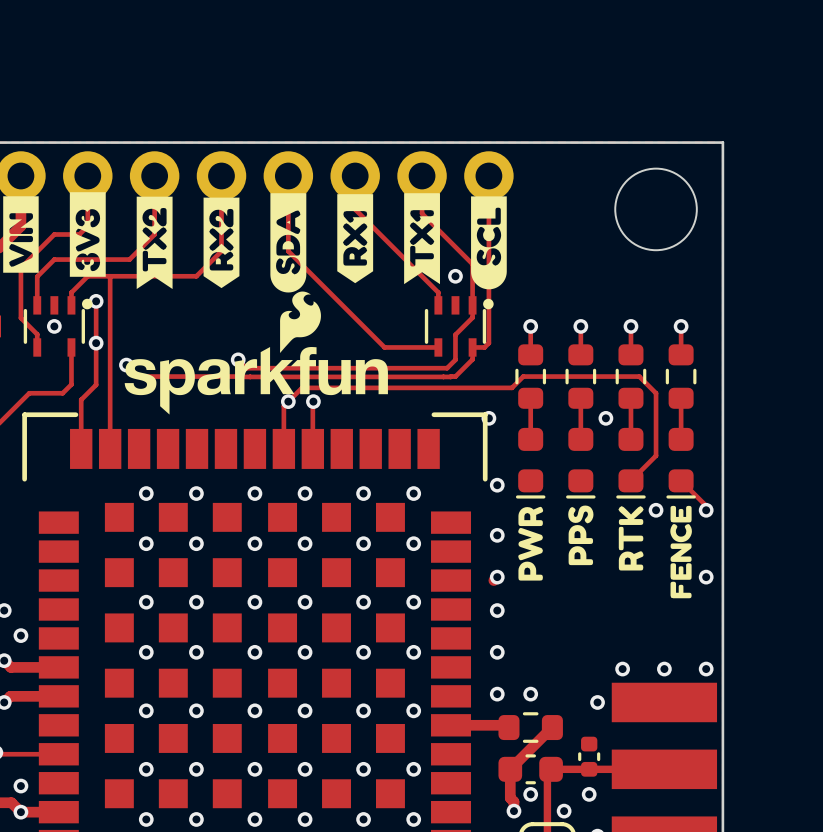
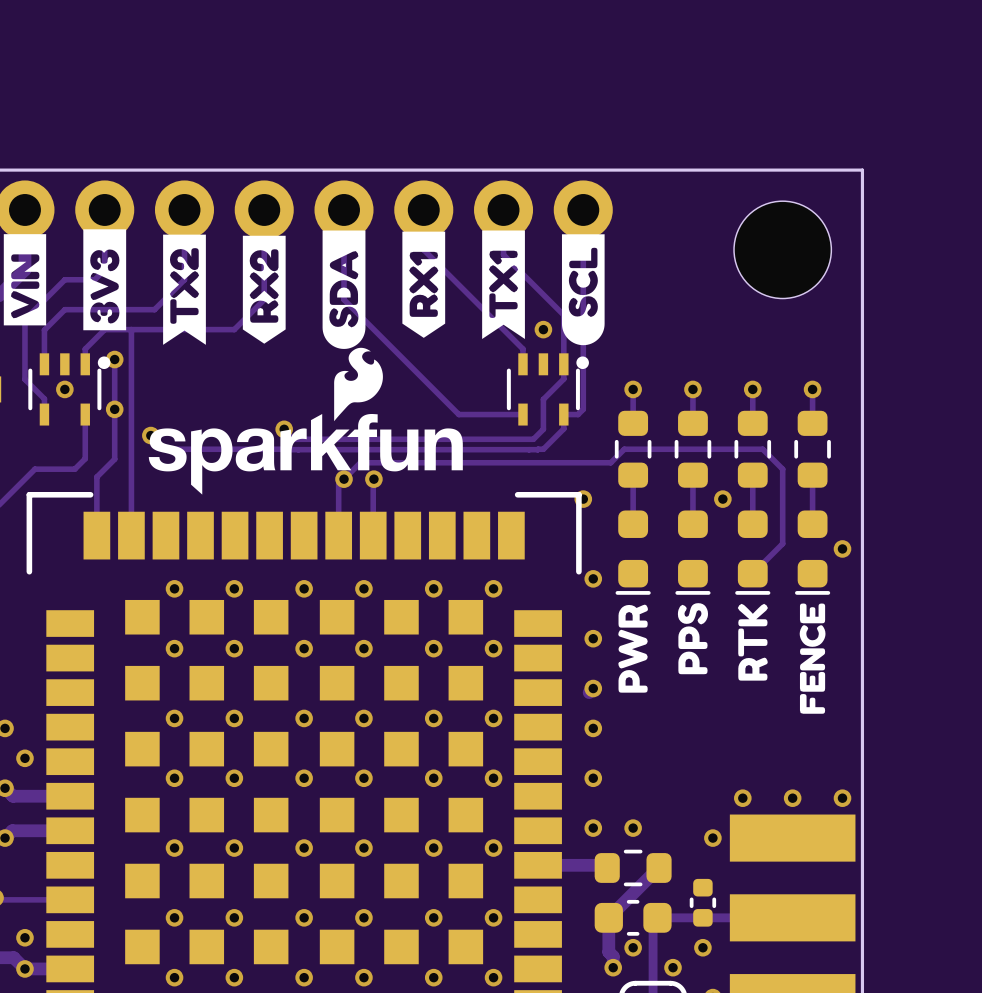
via: none -> (842, 548)
track: (681, 480) (706, 505) (706, 510) -> none
via: (656, 510) -> none
via: (706, 510) -> none
via: (706, 577) -> none

